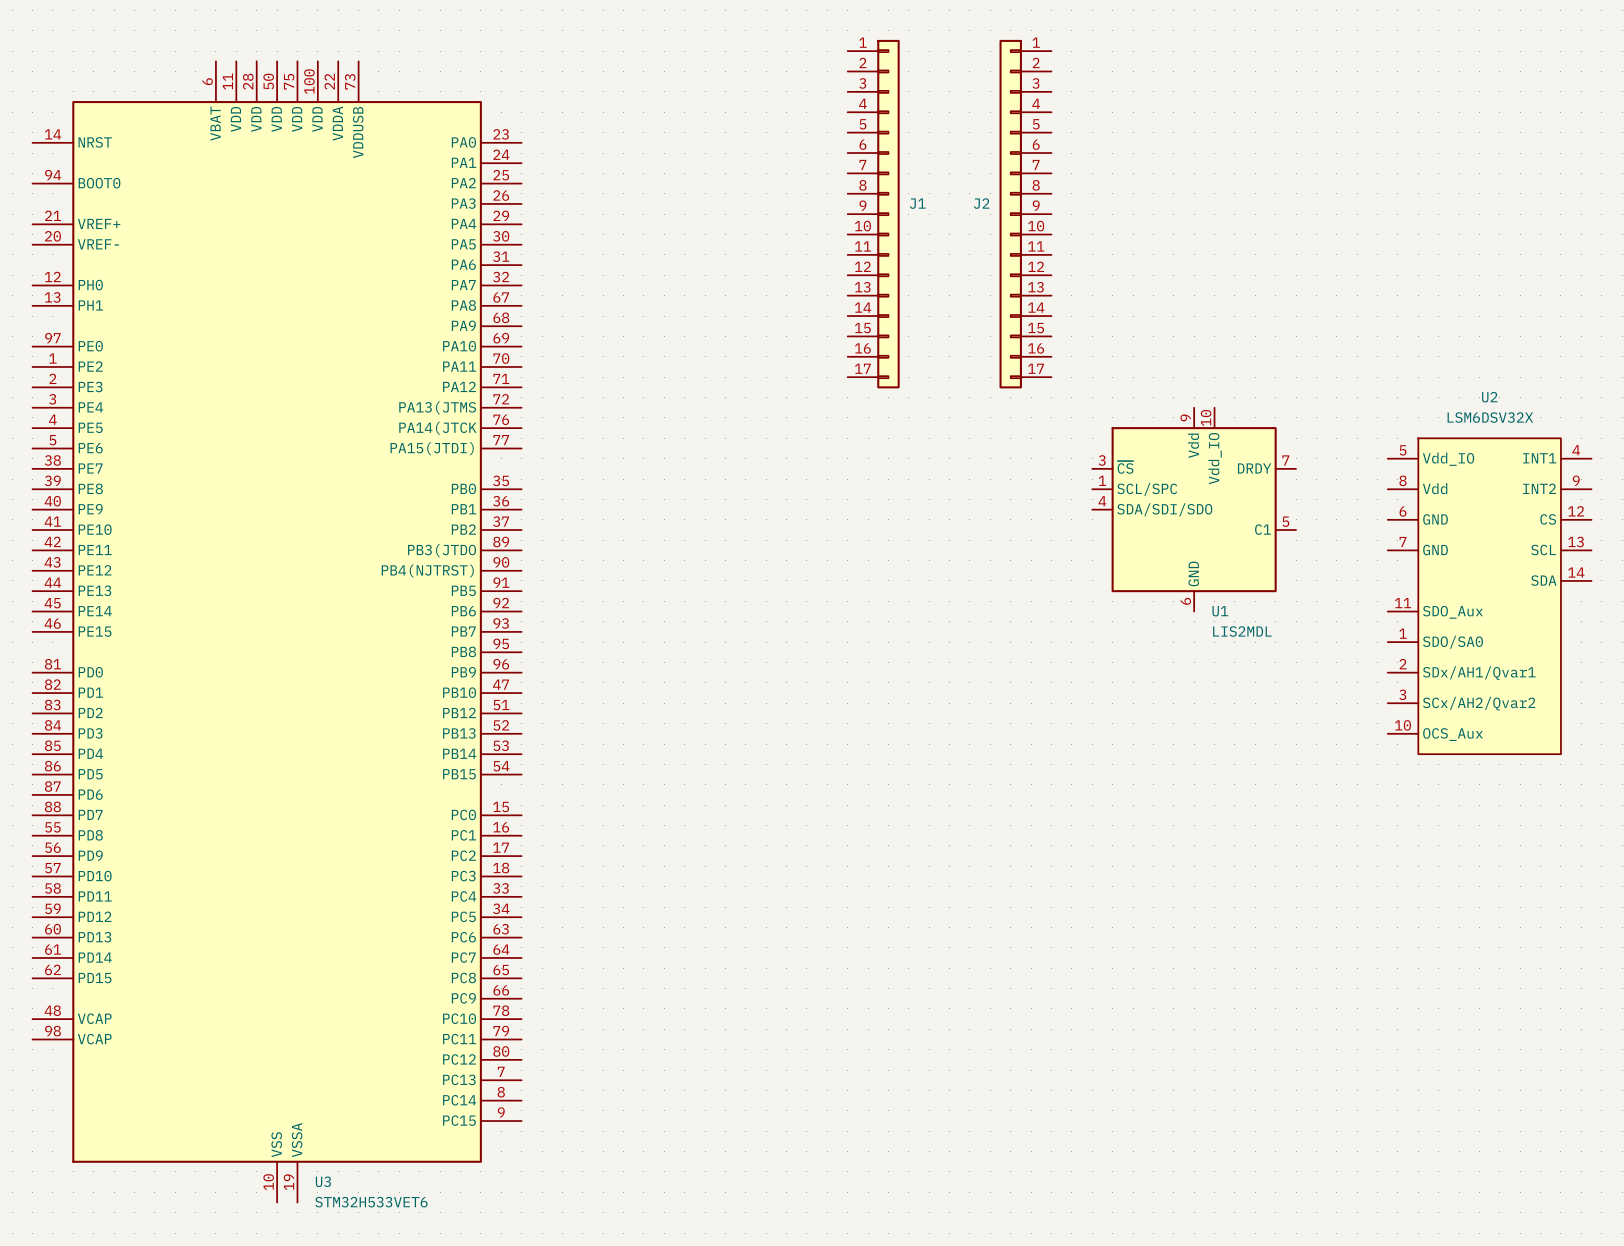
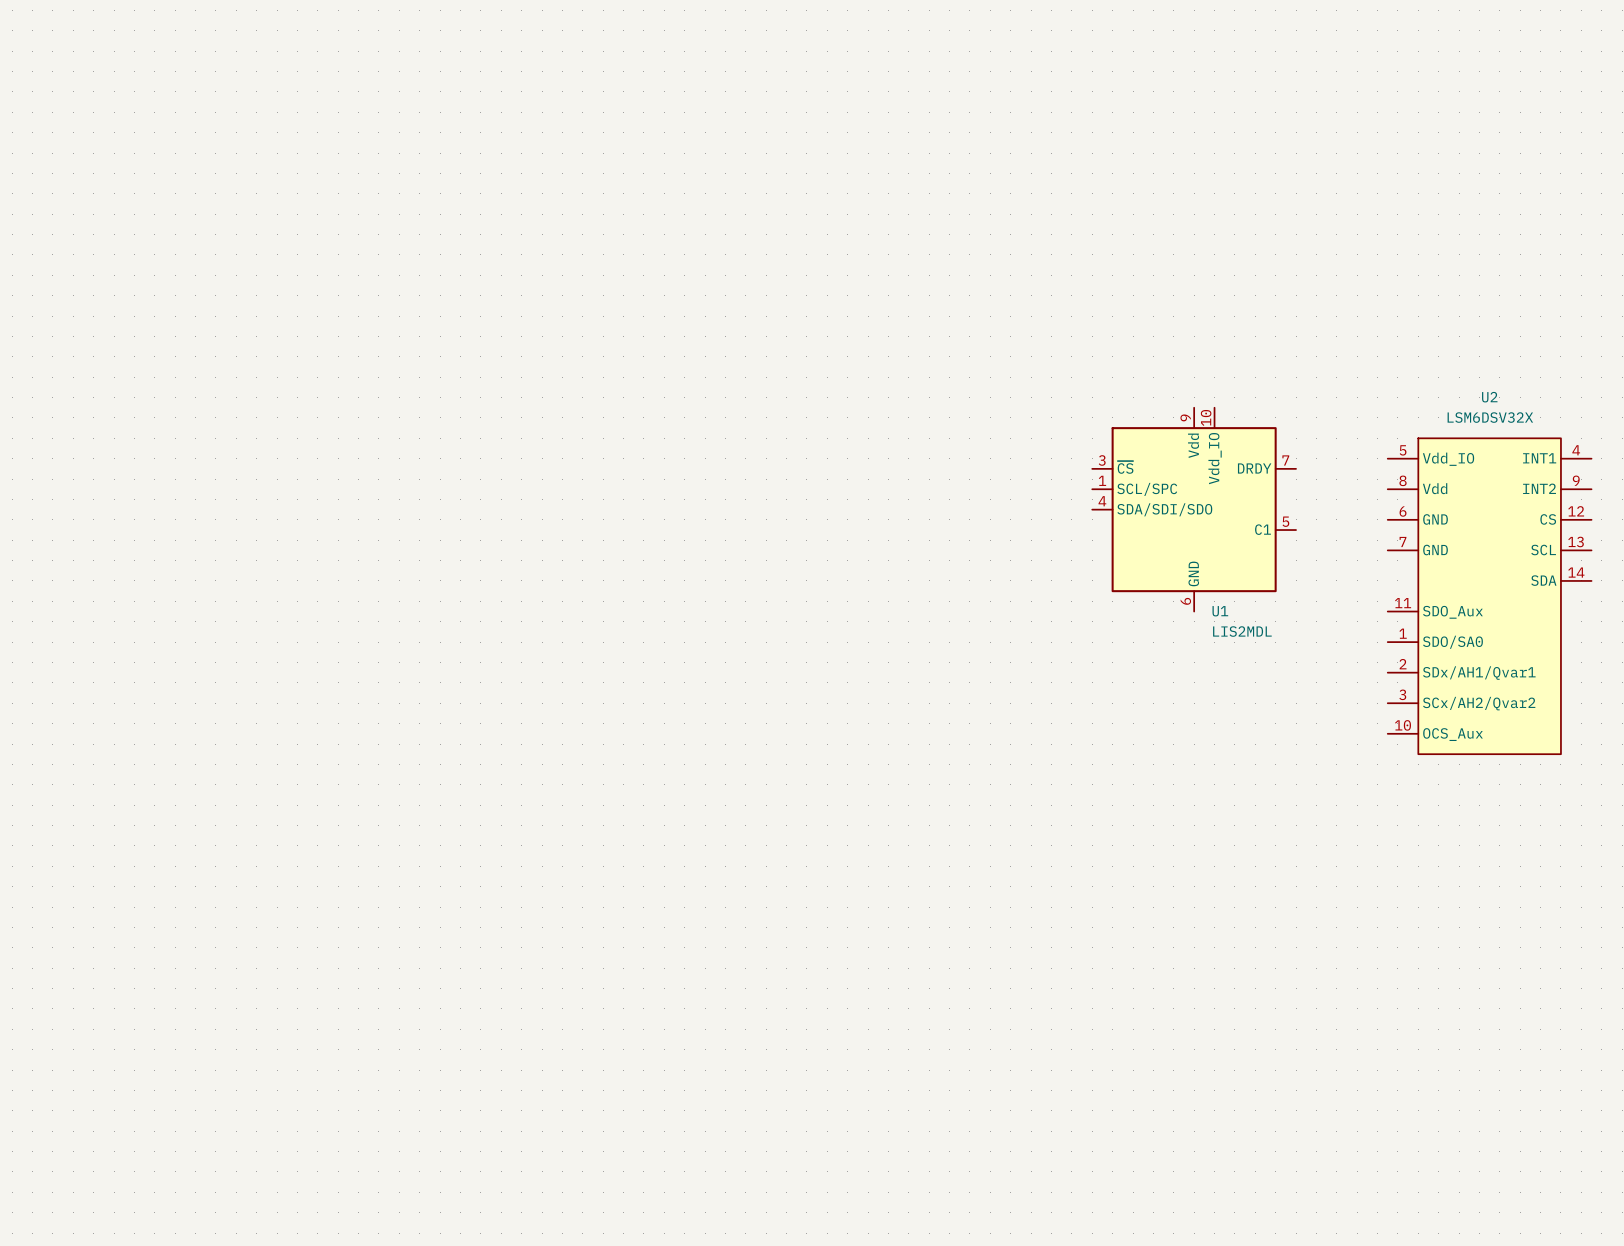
J1: (873, 214) -> none
J2: (1025, 214) -> none
U3: STM32H533VET6 (277, 631) -> none

